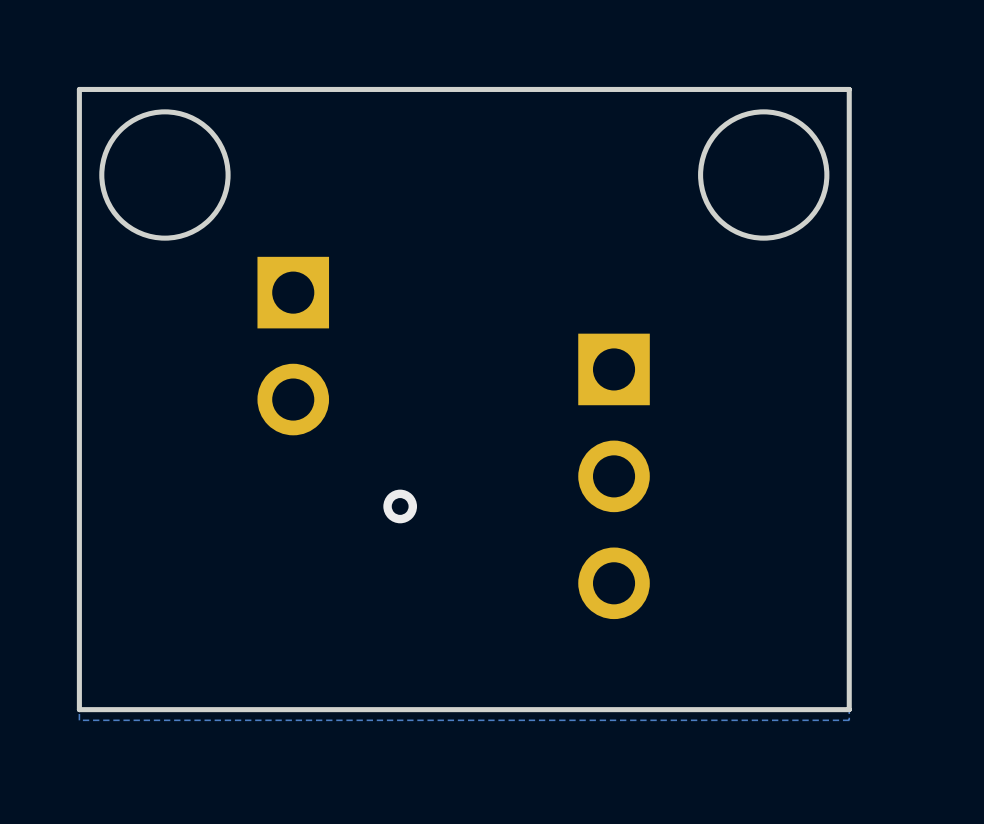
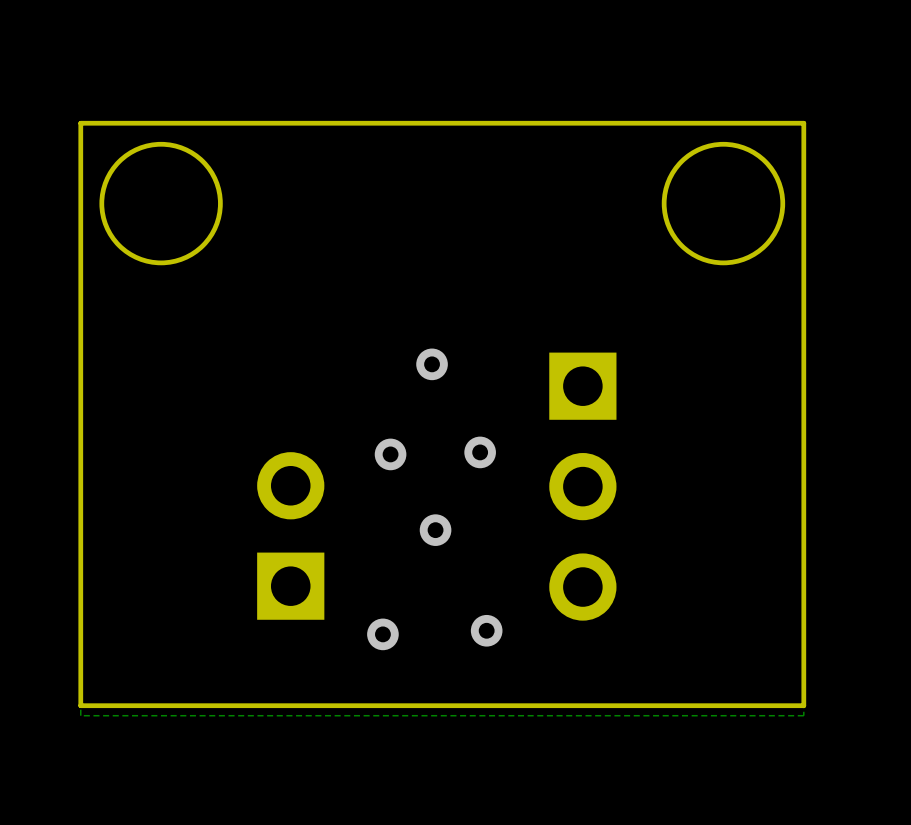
part rotation: 0° (293, 346) -> 180° (290, 535)
part position: (293, 346) -> (290, 535)
via: none -> (432, 364)
via: none -> (480, 452)
via: none -> (390, 454)
via: (400, 506) -> none
via: none -> (435, 530)
via: none -> (486, 630)
via: none -> (382, 634)

